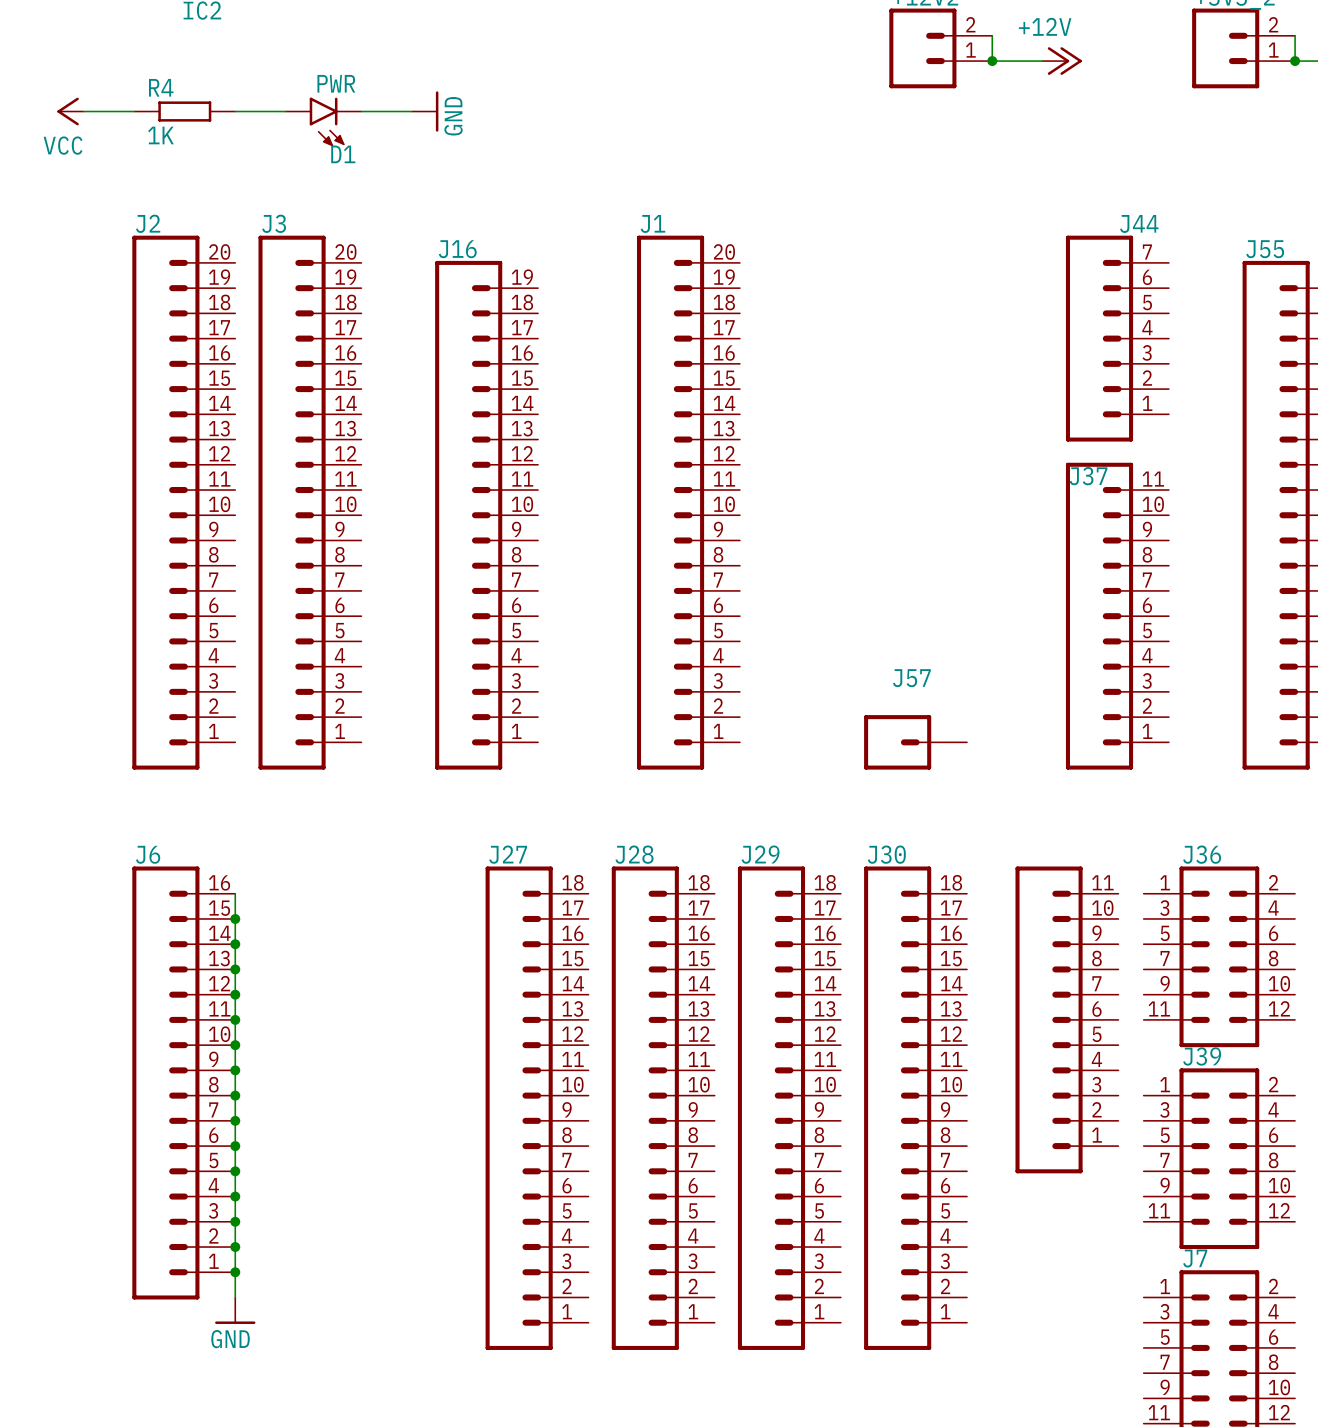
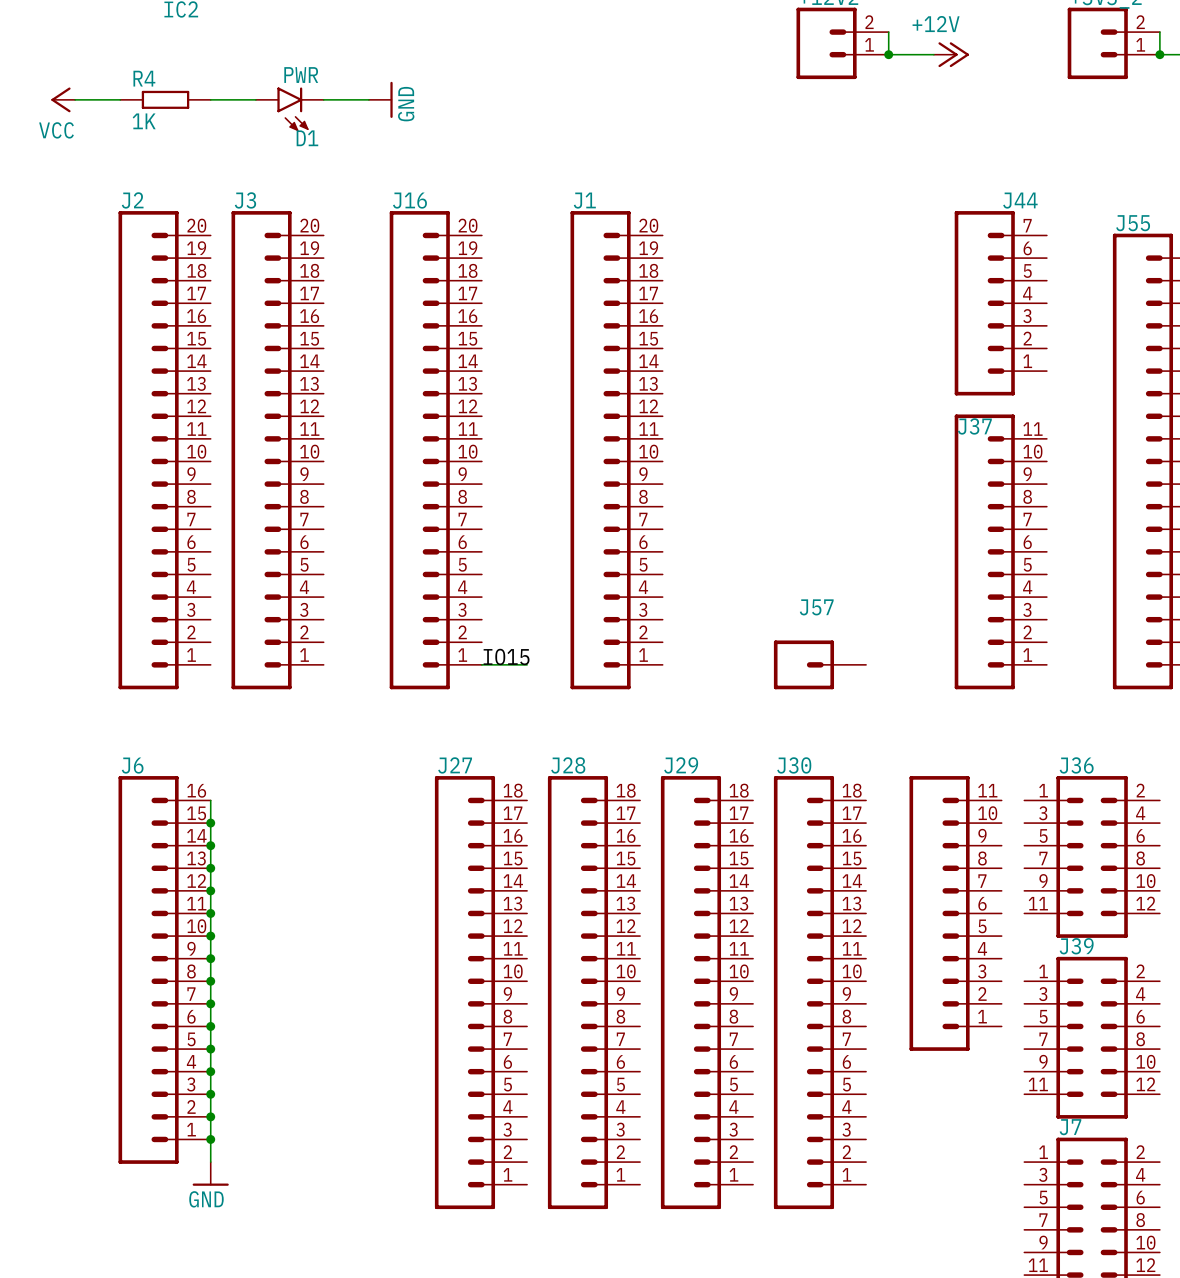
J16 symbol: [435, 260, 539, 770] -> [389, 211, 482, 690]
label: none -> IO15 (506, 656)
wire: none -> (481, 664) (527, 664)

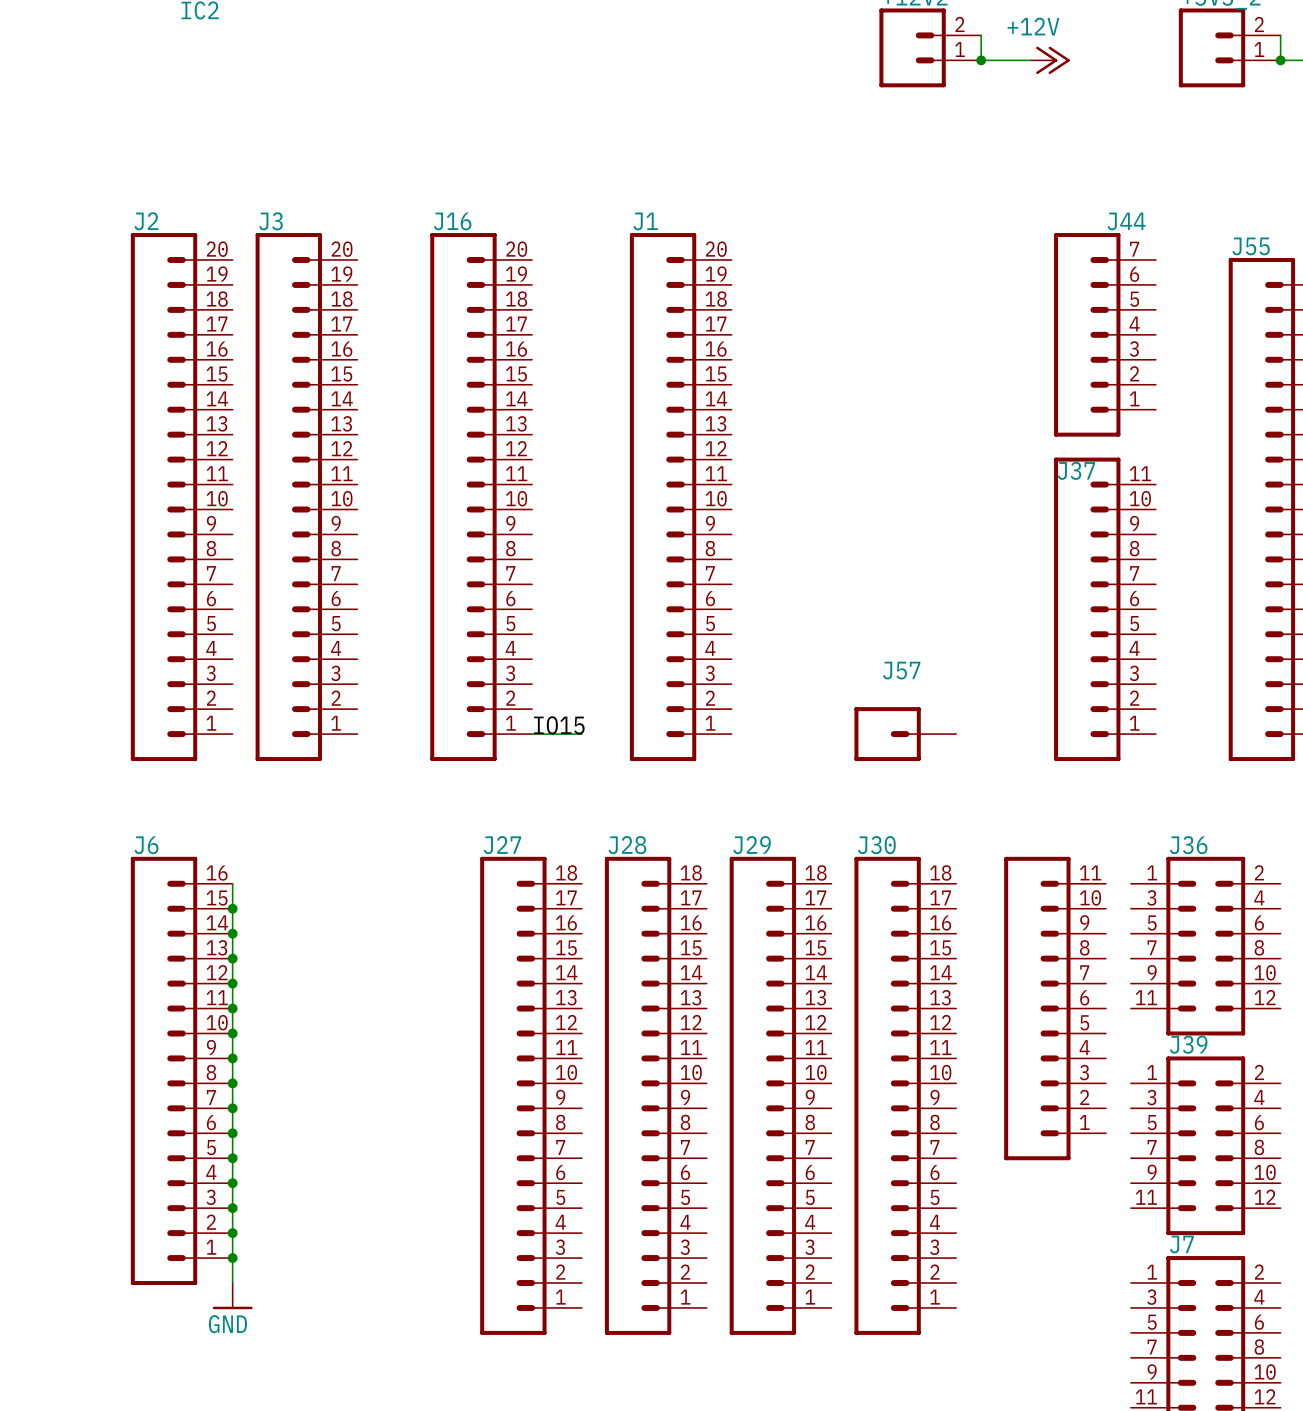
power symbol: VCC (63, 99) -> none
wire: (75, 99) (120, 99) -> none
R4: 1K (165, 99) -> none
wire: (210, 99) (255, 99) -> none
wire: (323, 99) (368, 99) -> none
power symbol: GND (380, 99) -> none
D1: PWR (289, 109) -> none

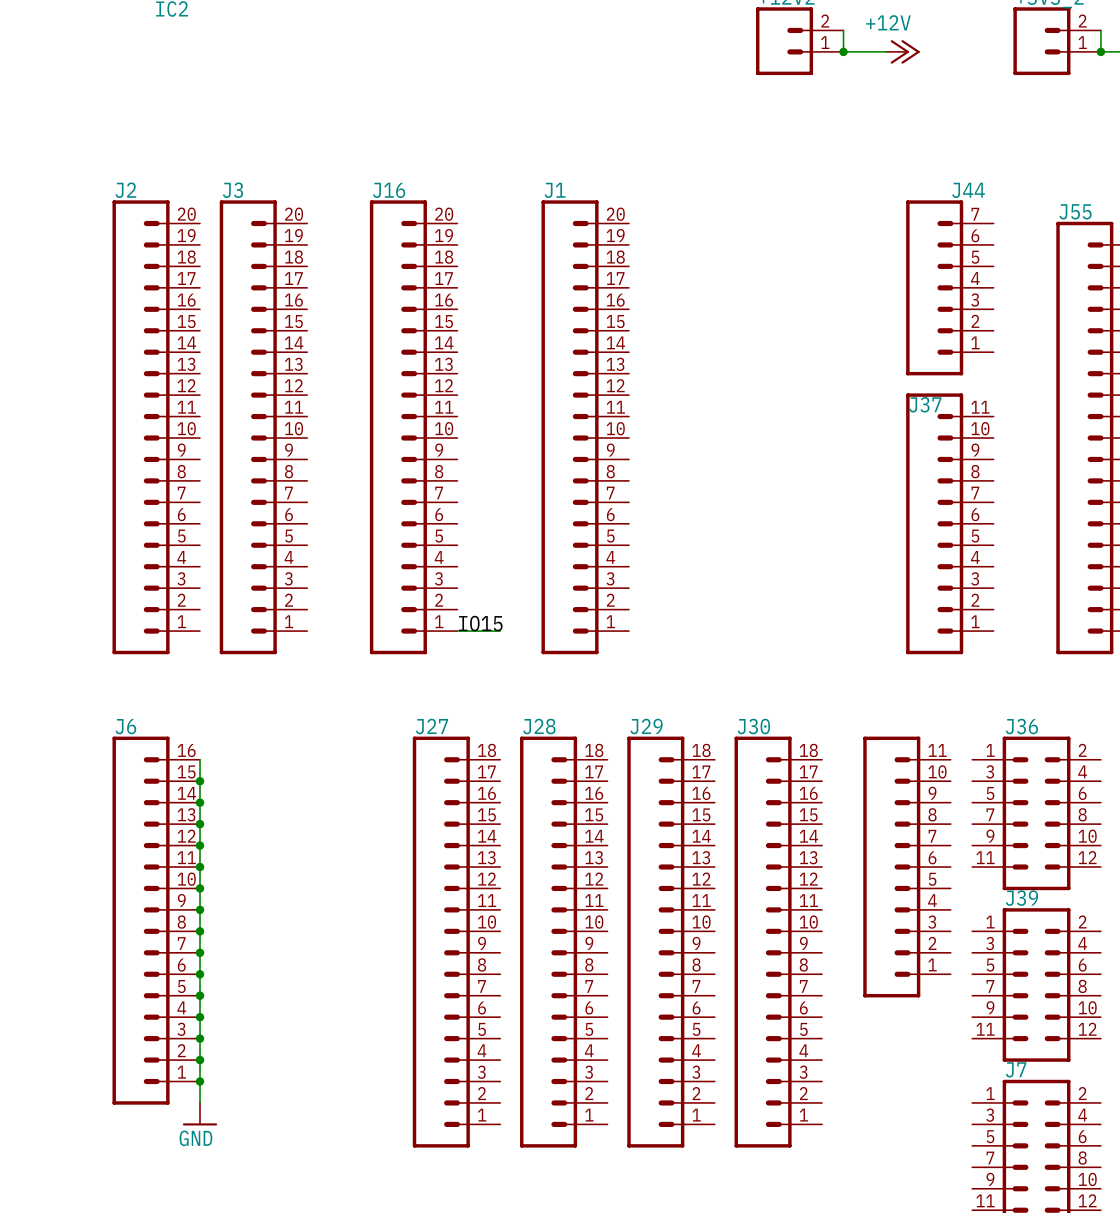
J57: (905, 734) -> none

